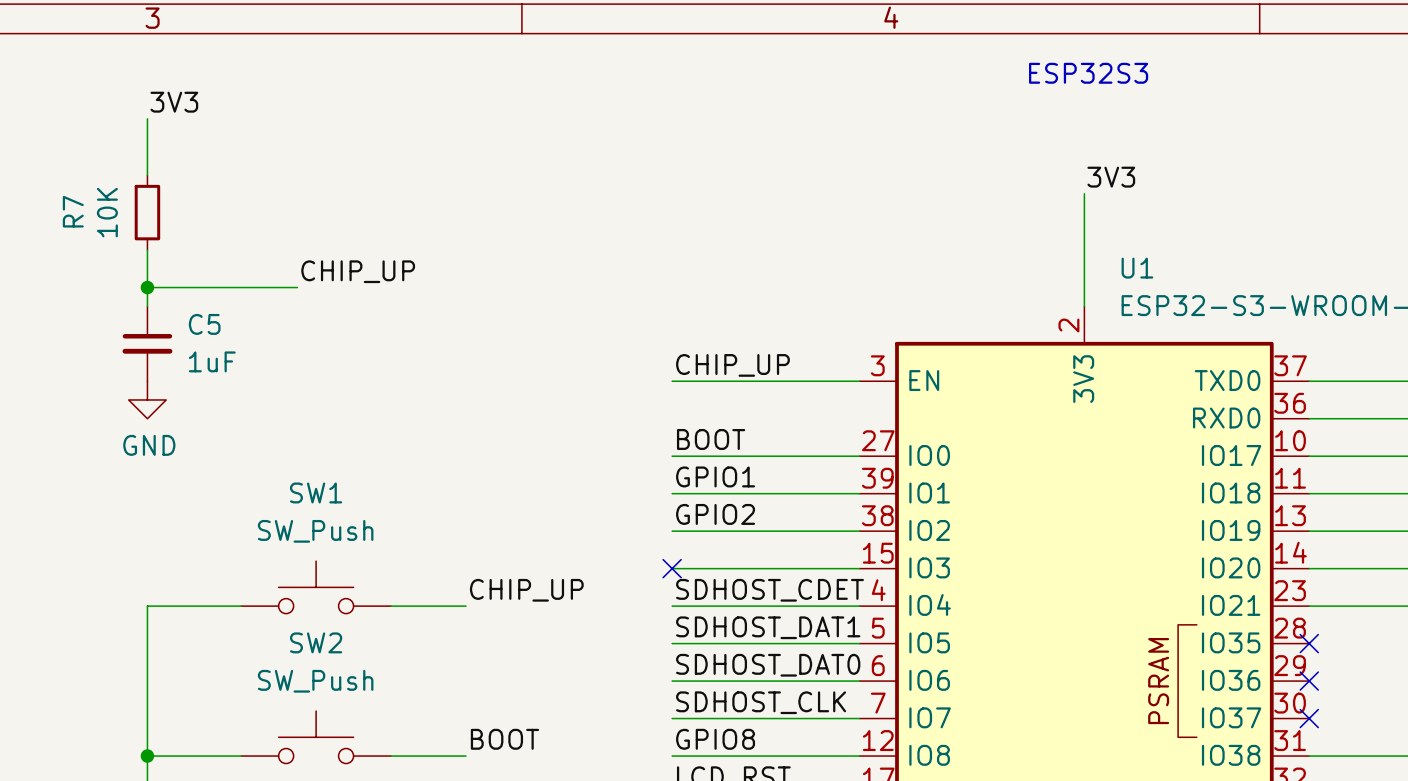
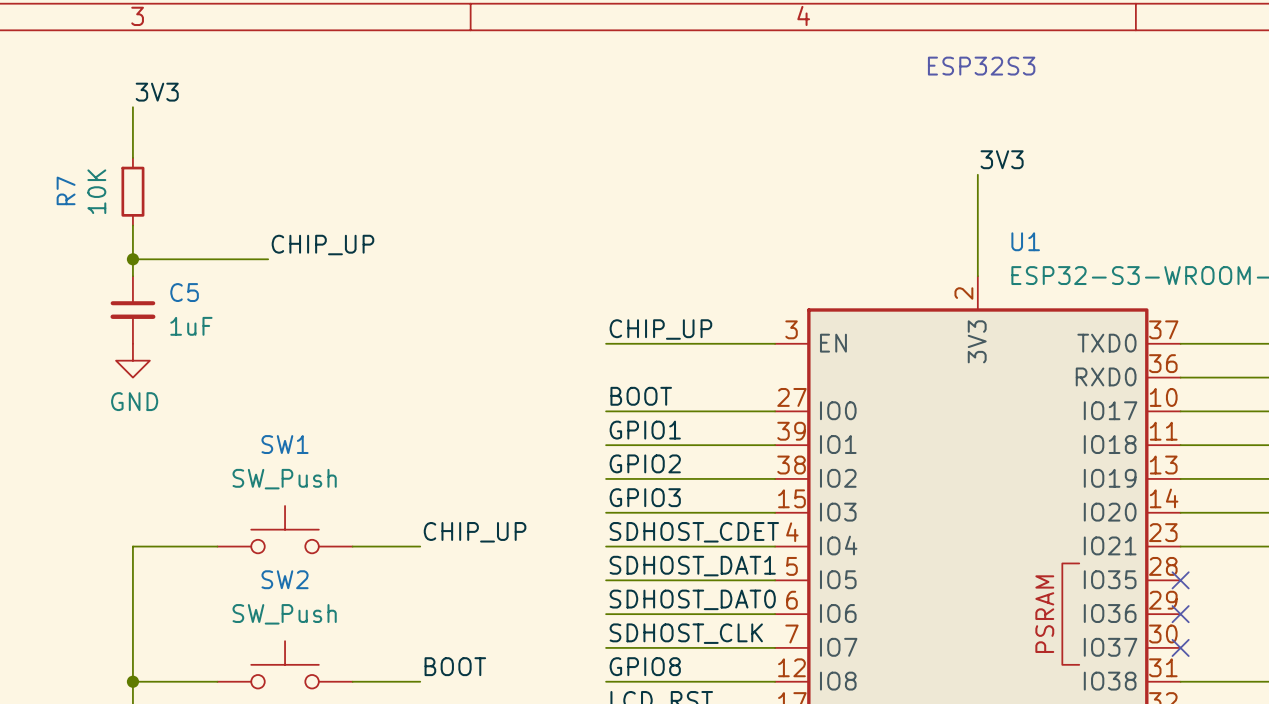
label: none -> GPIO3 (645, 497)
no-connect mark: (672, 568) -> none

